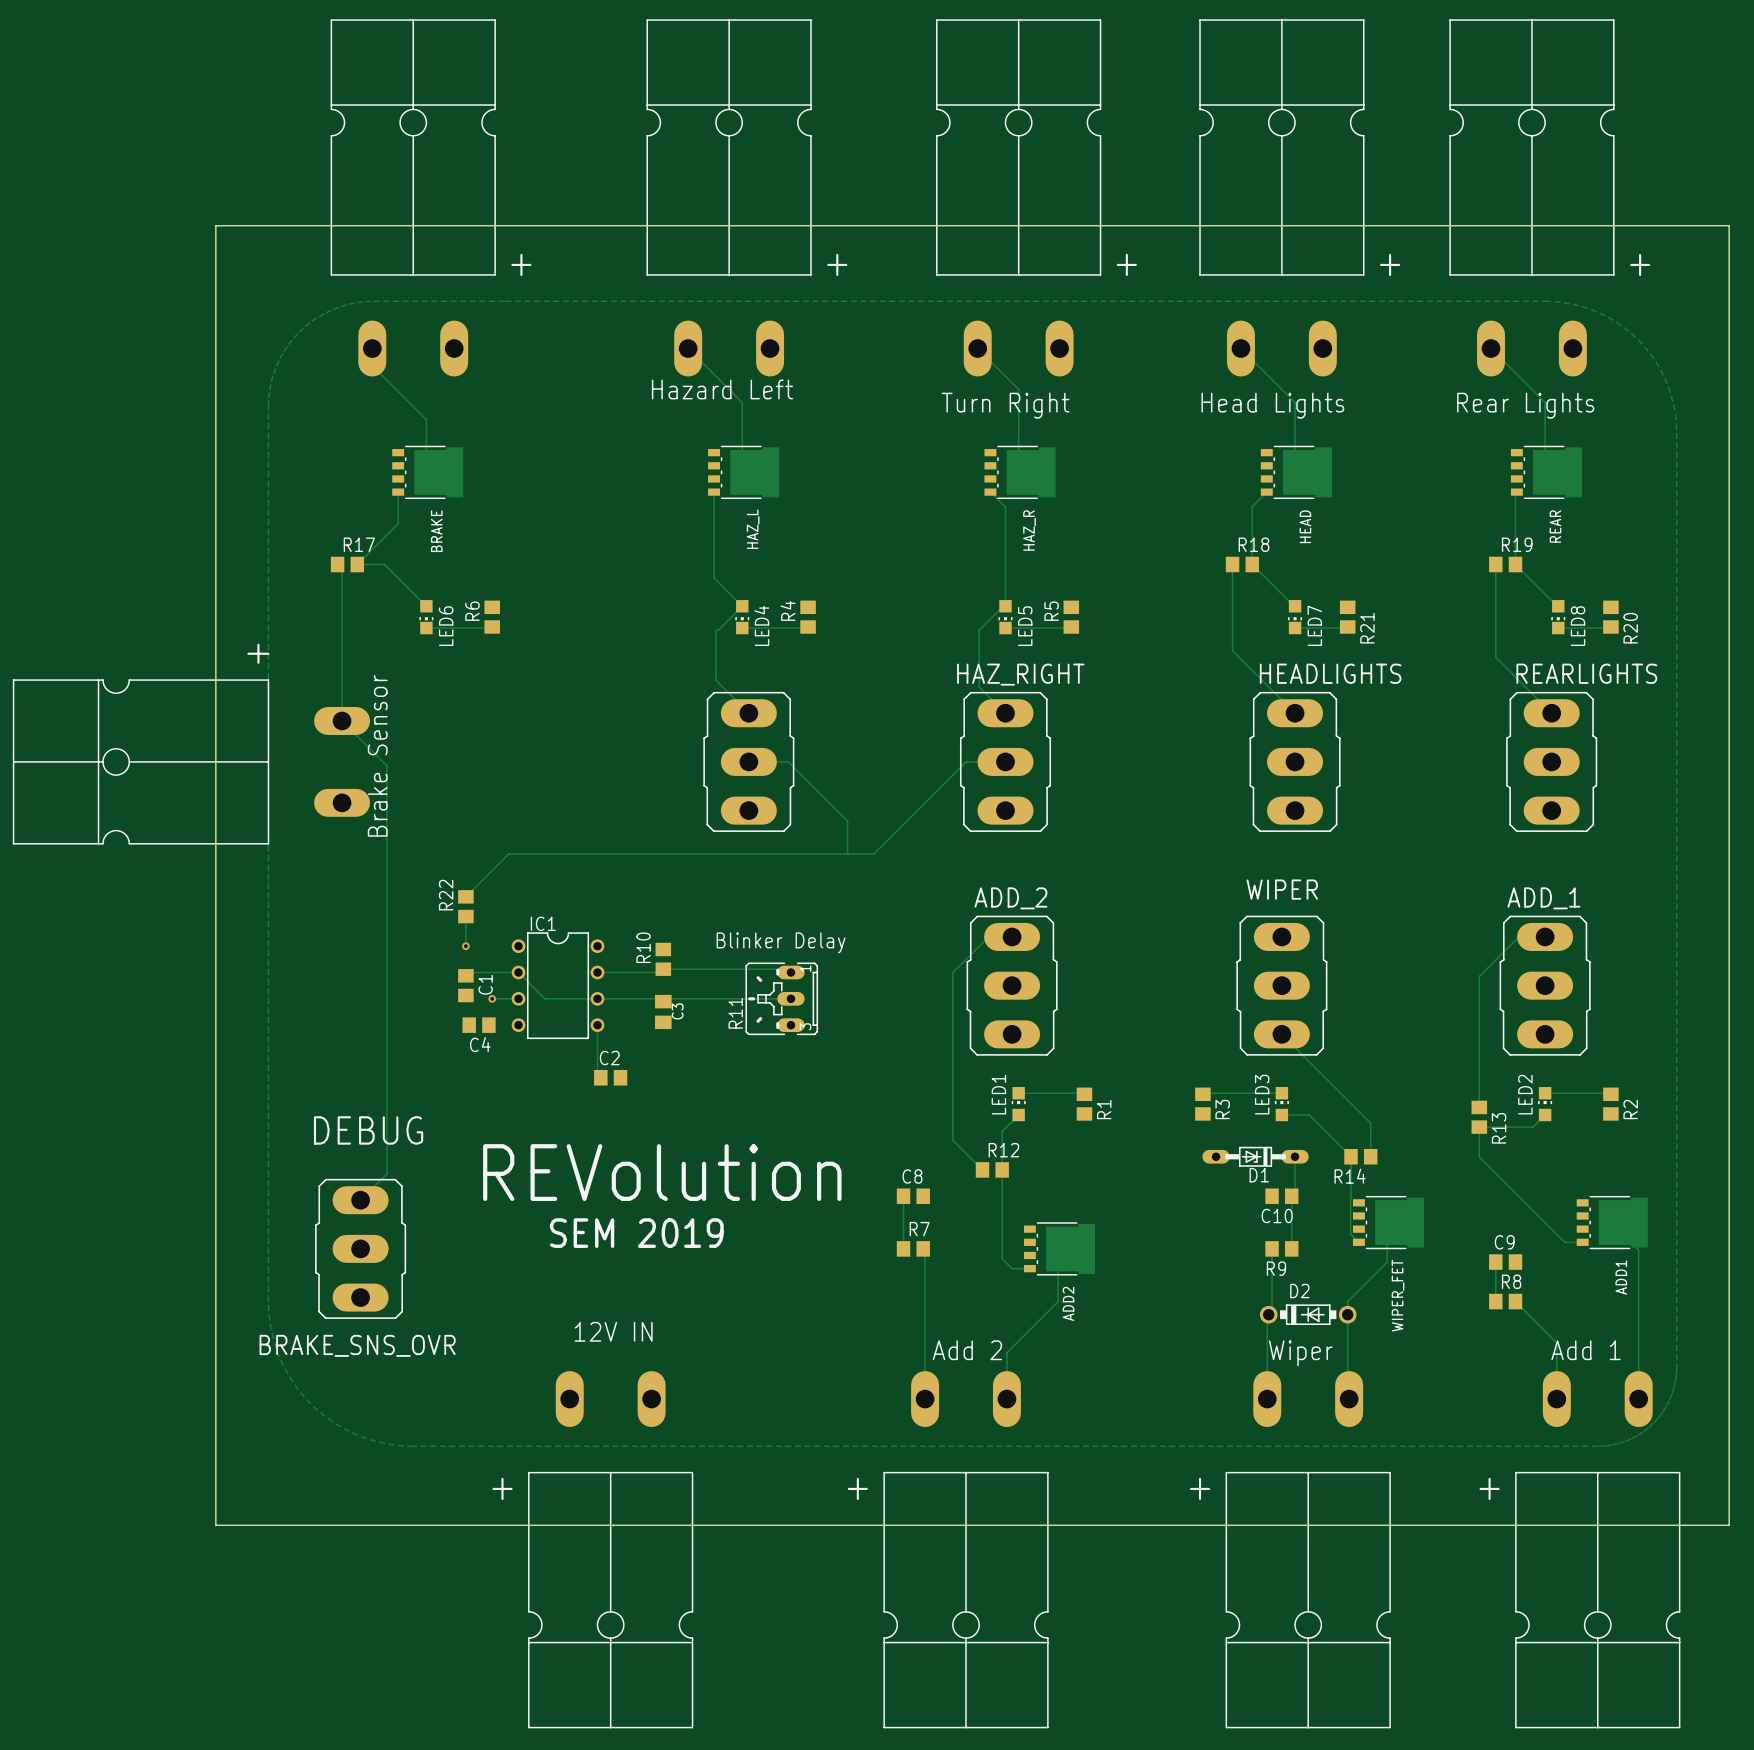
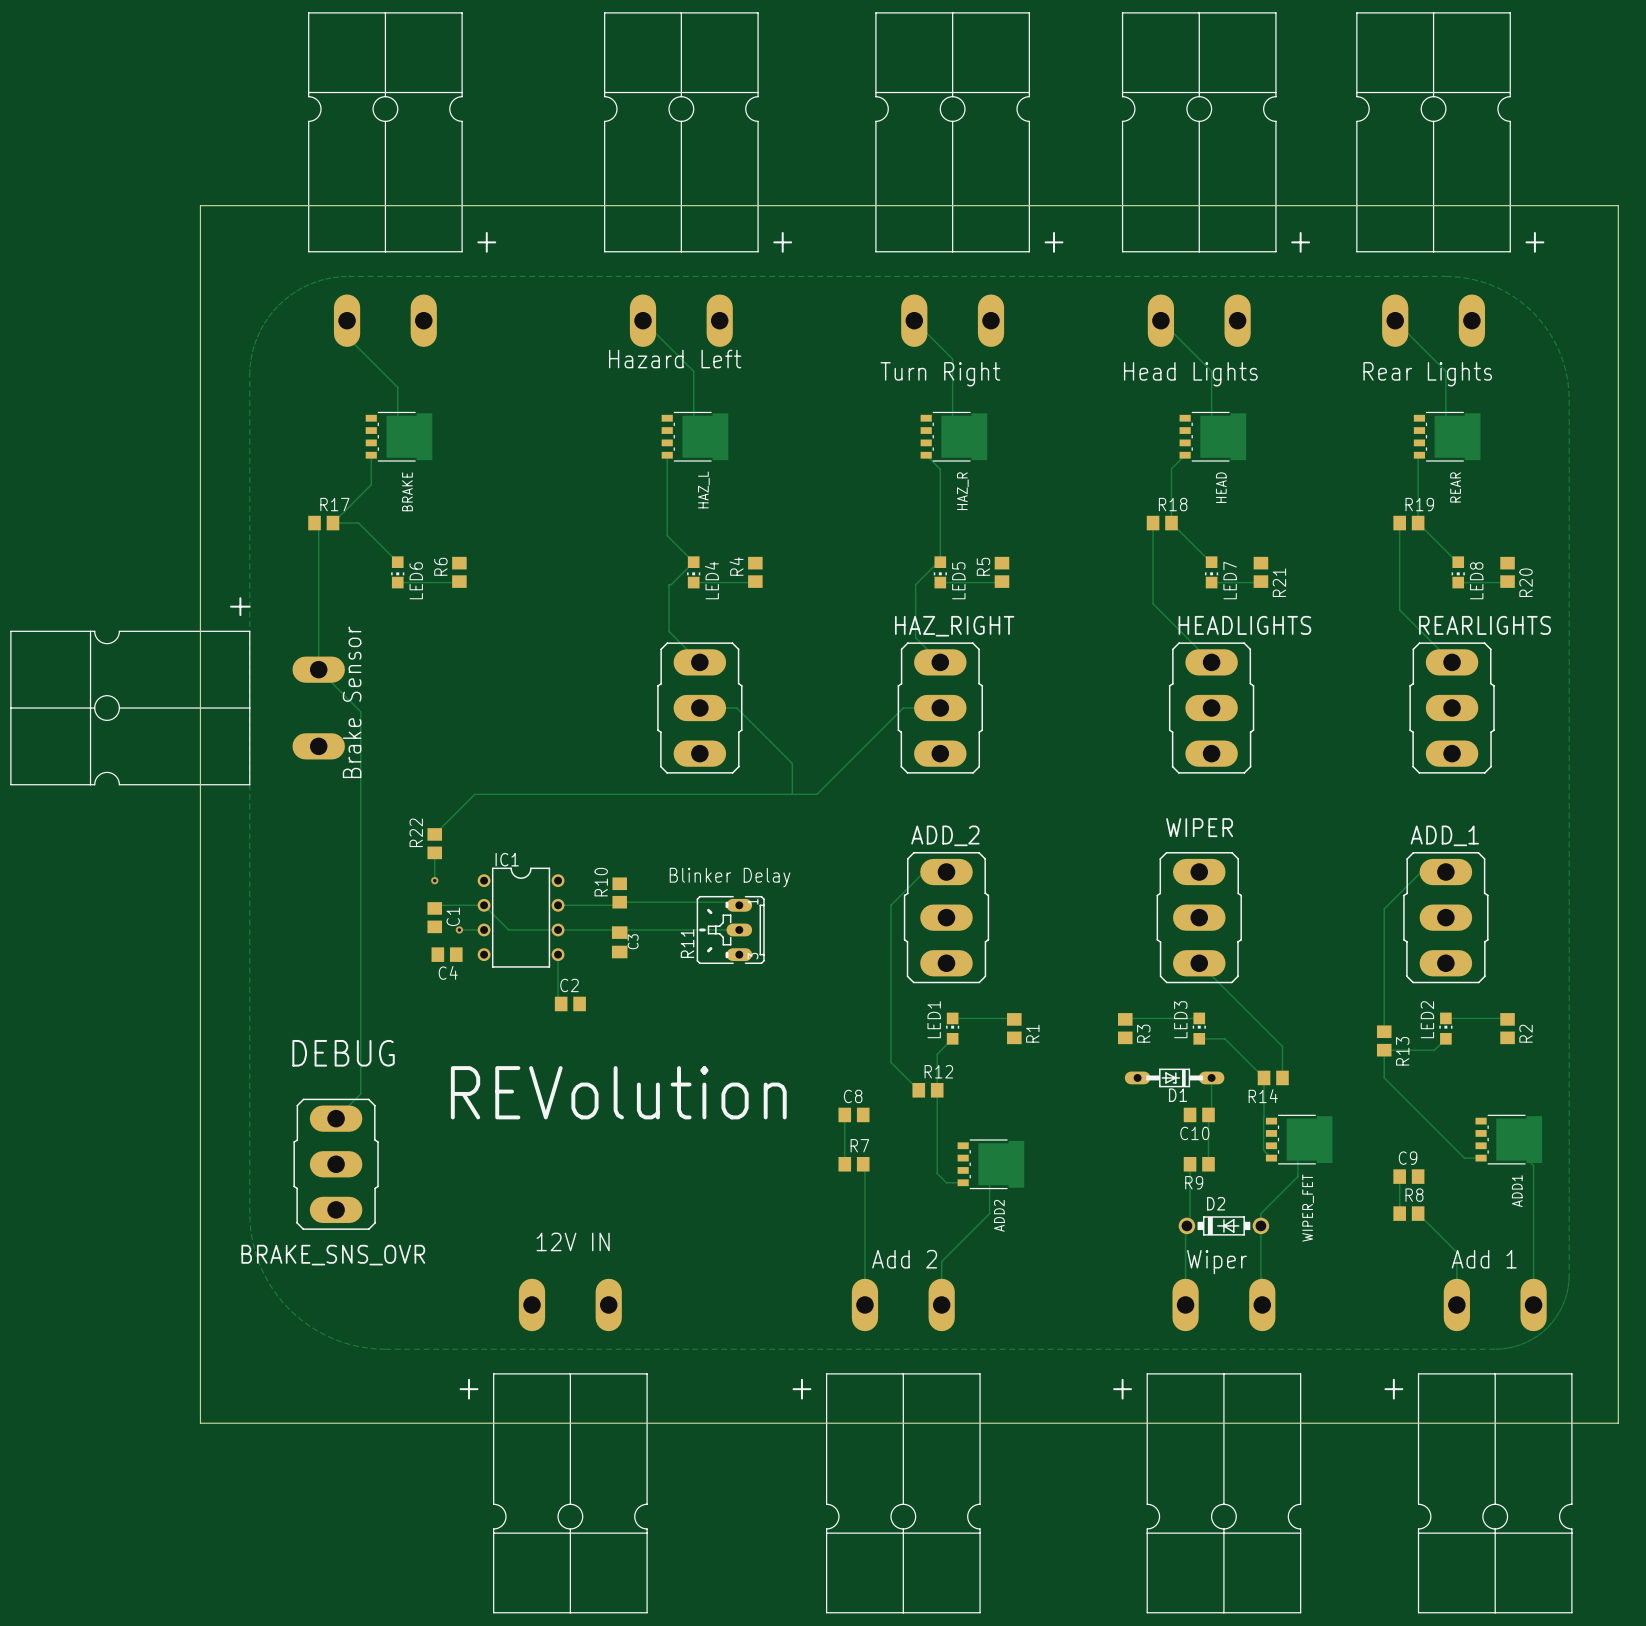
text: SEM 2019 (636, 1233) -> none

